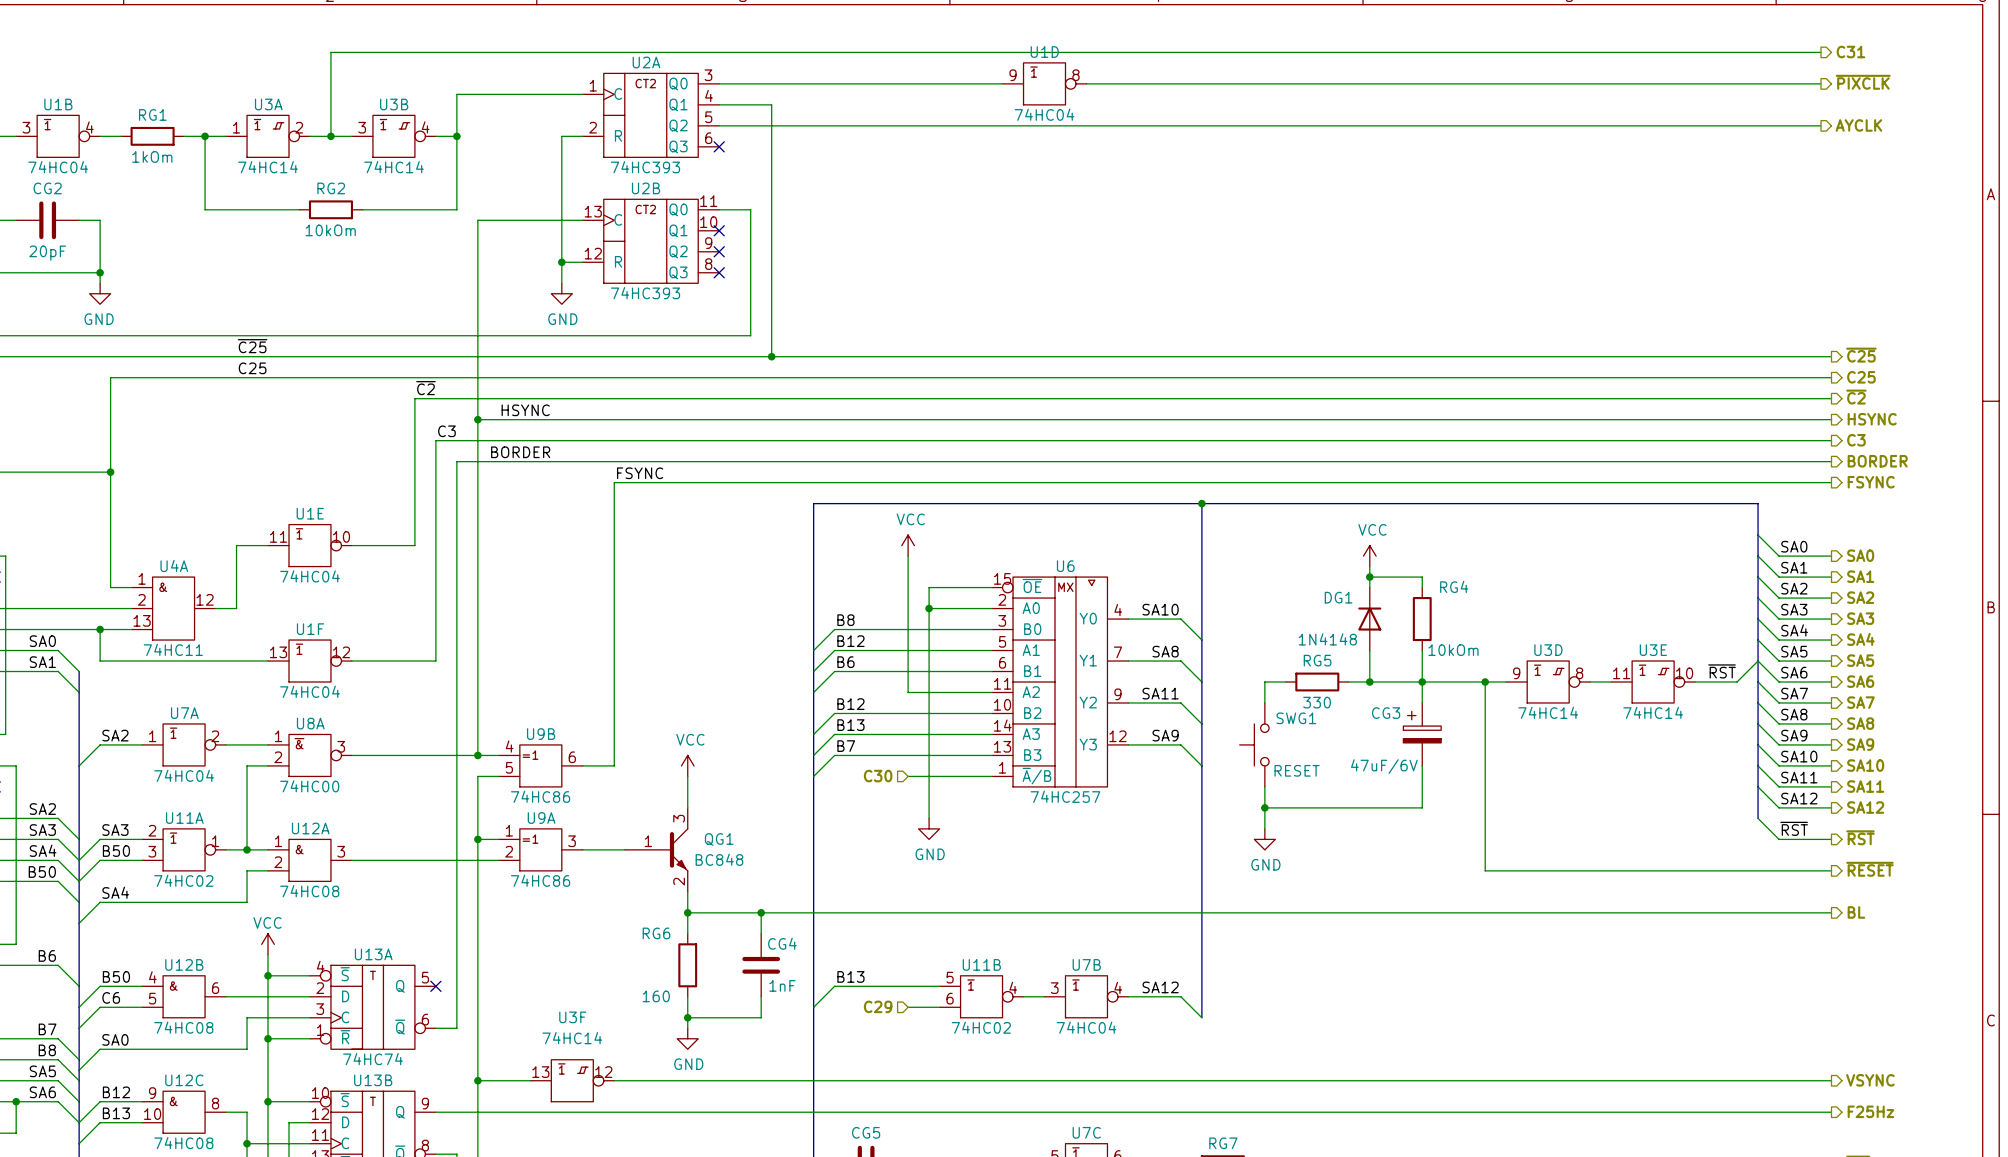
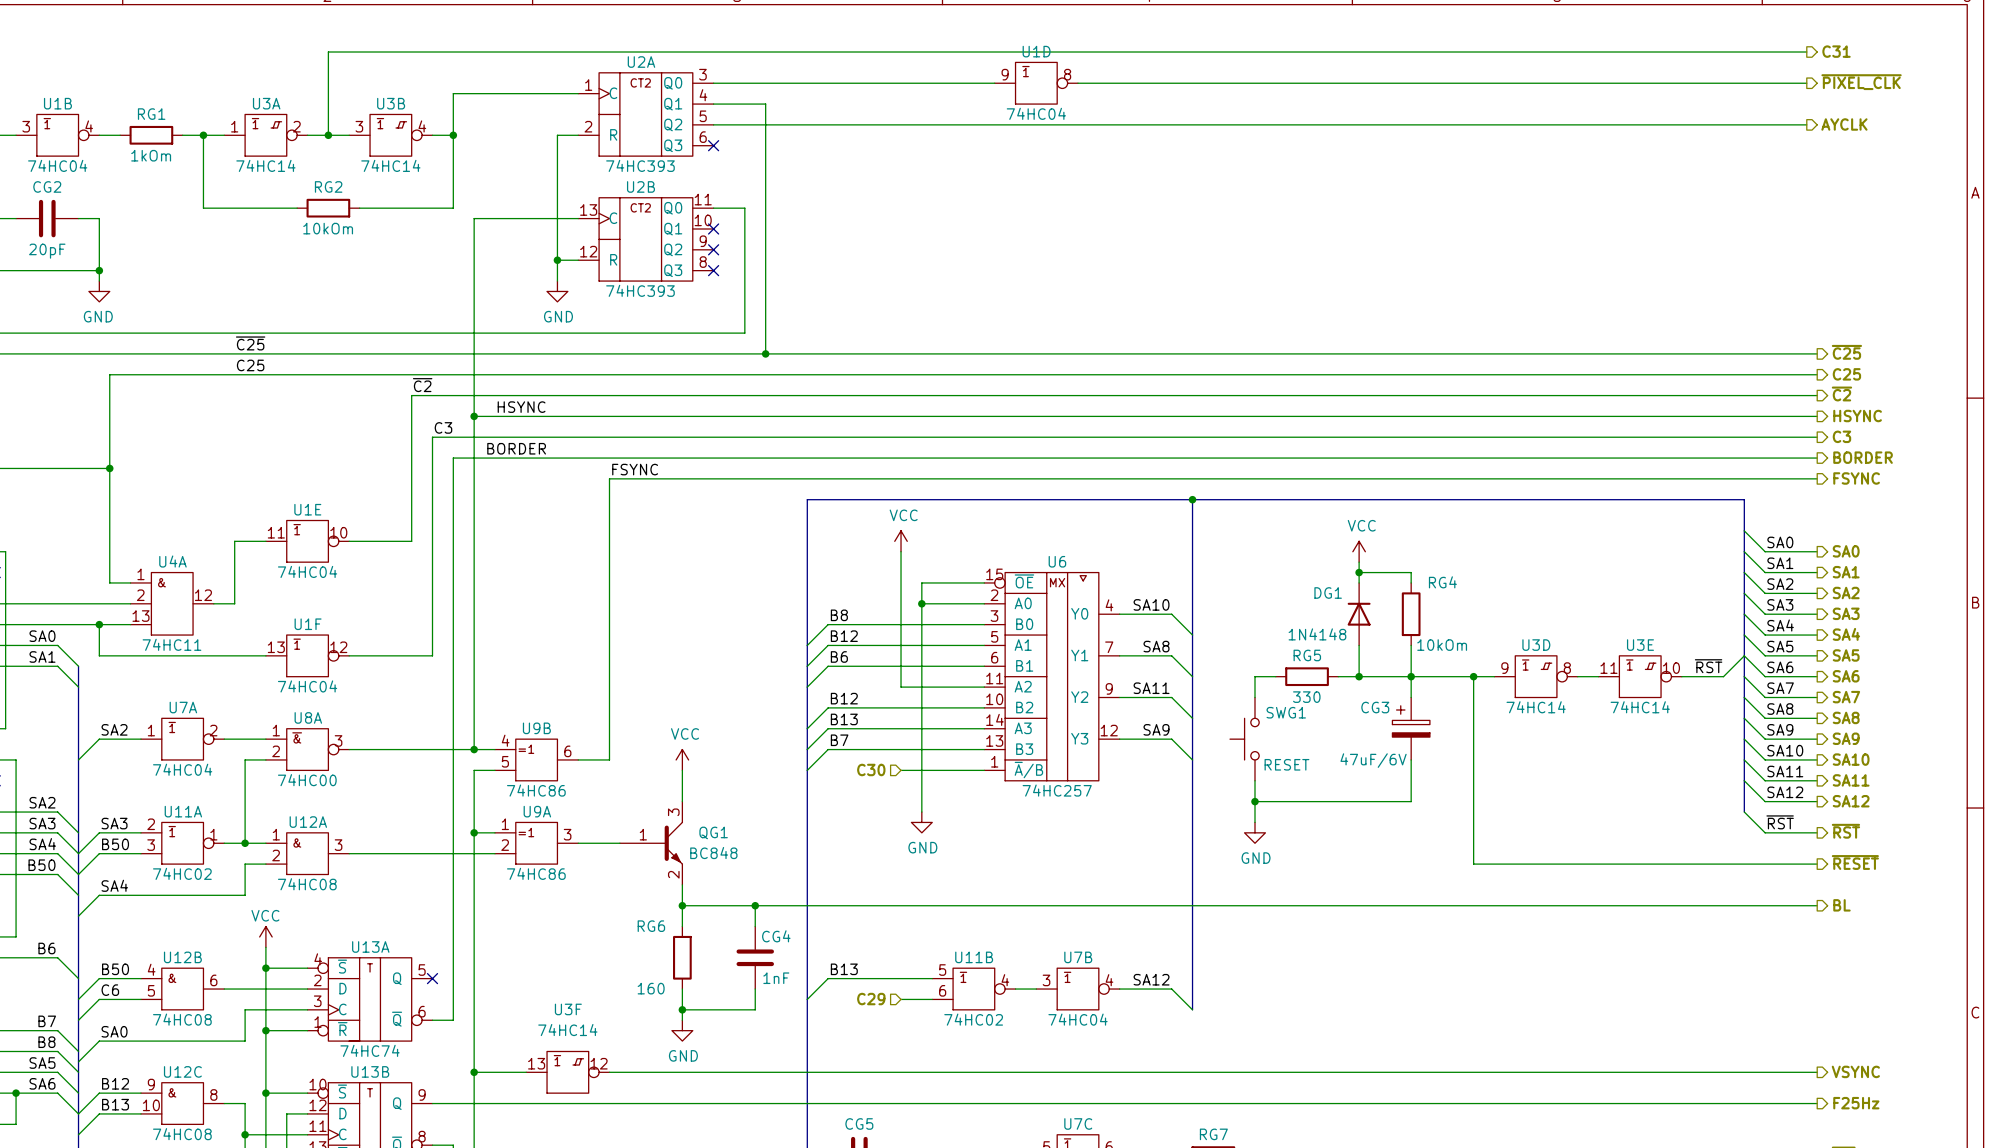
hierarchical label: ~{PIXCLK} (1863, 82) -> ~{PIXEL_CLK} (1861, 82)

